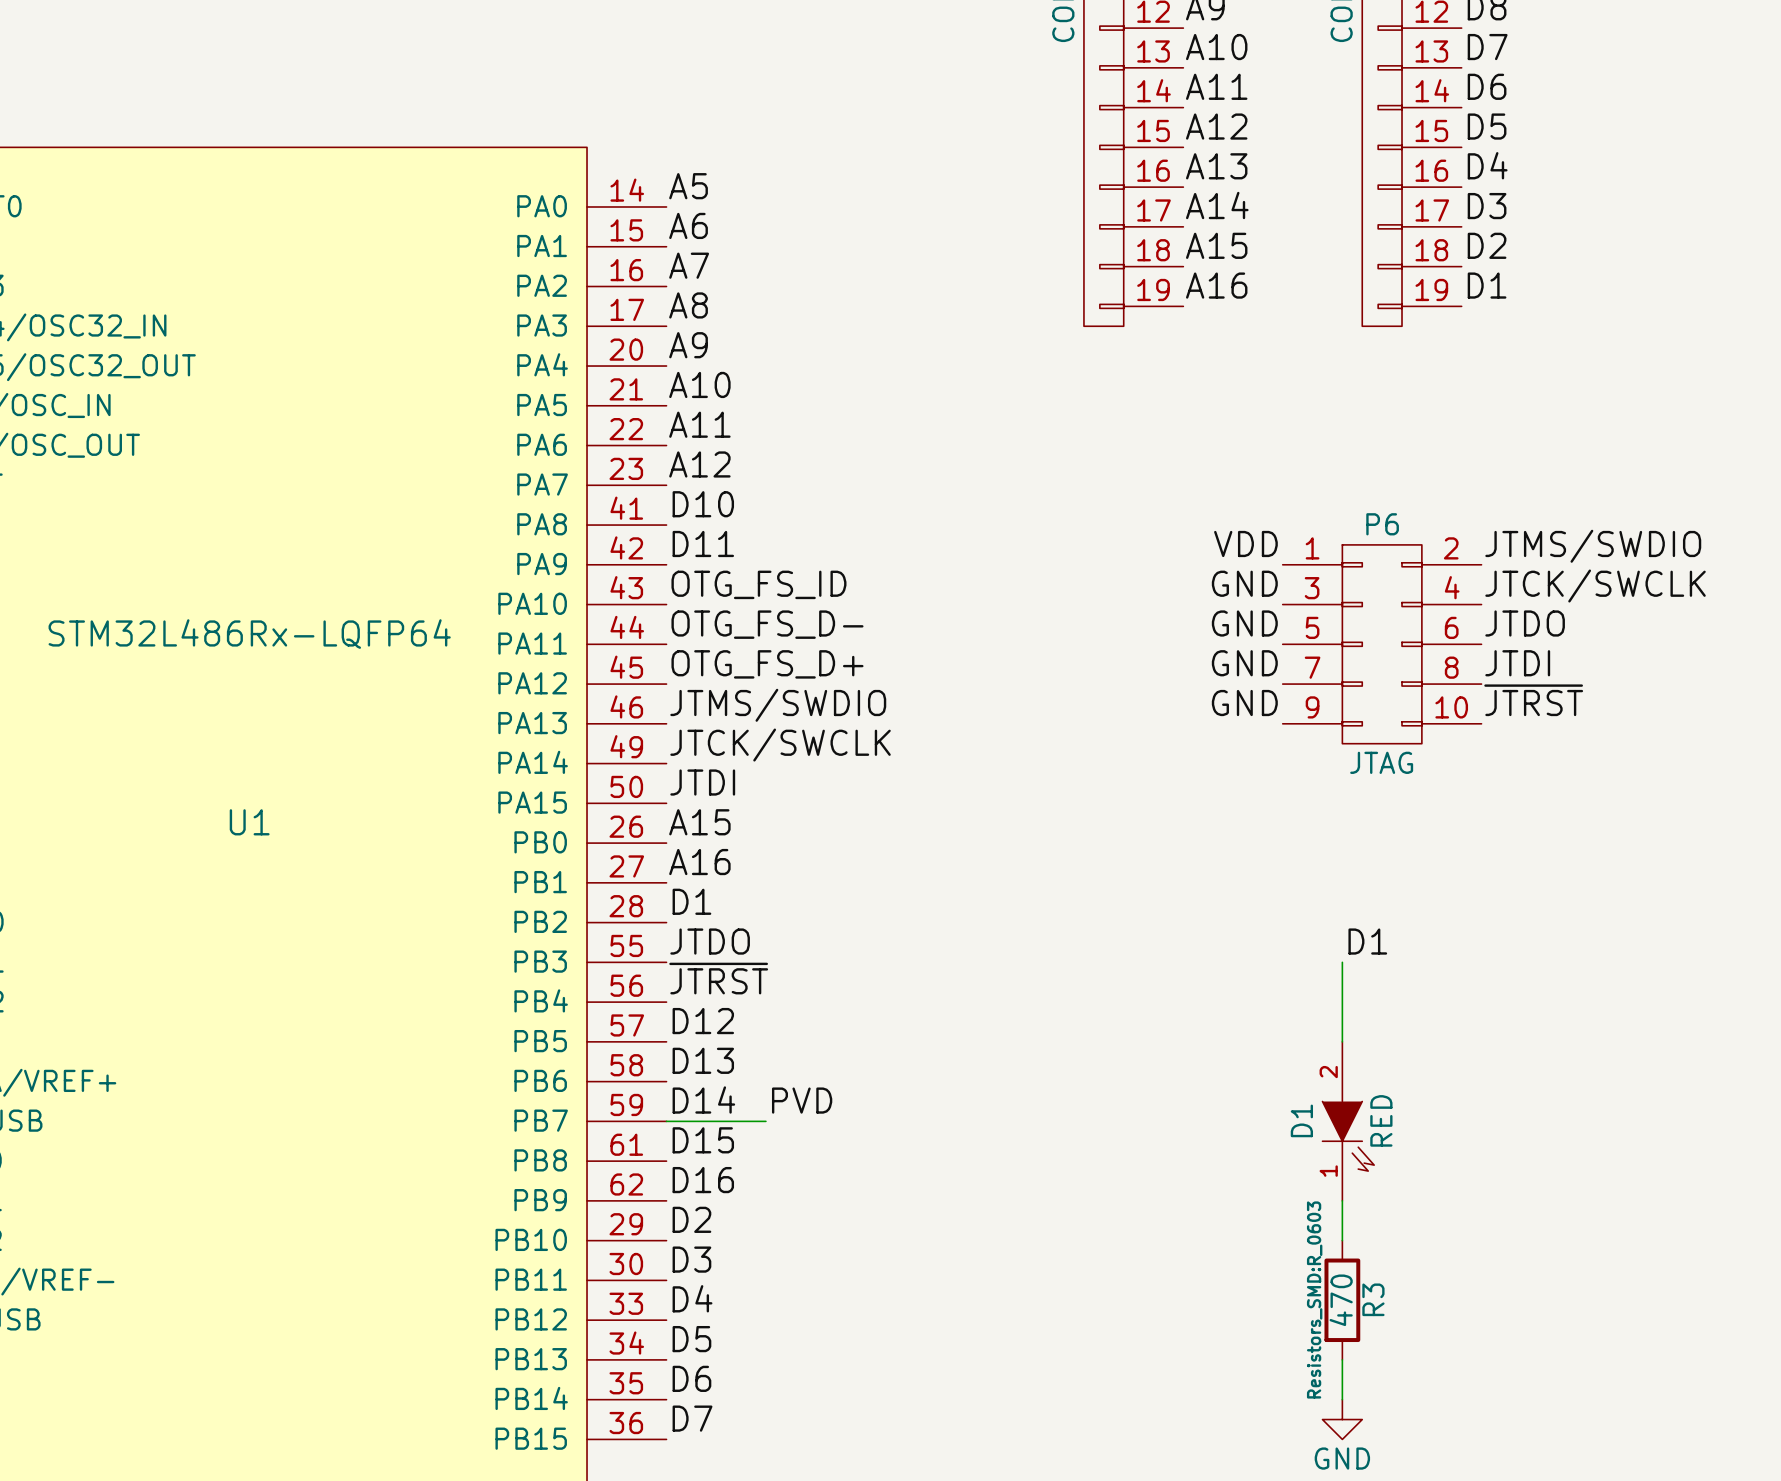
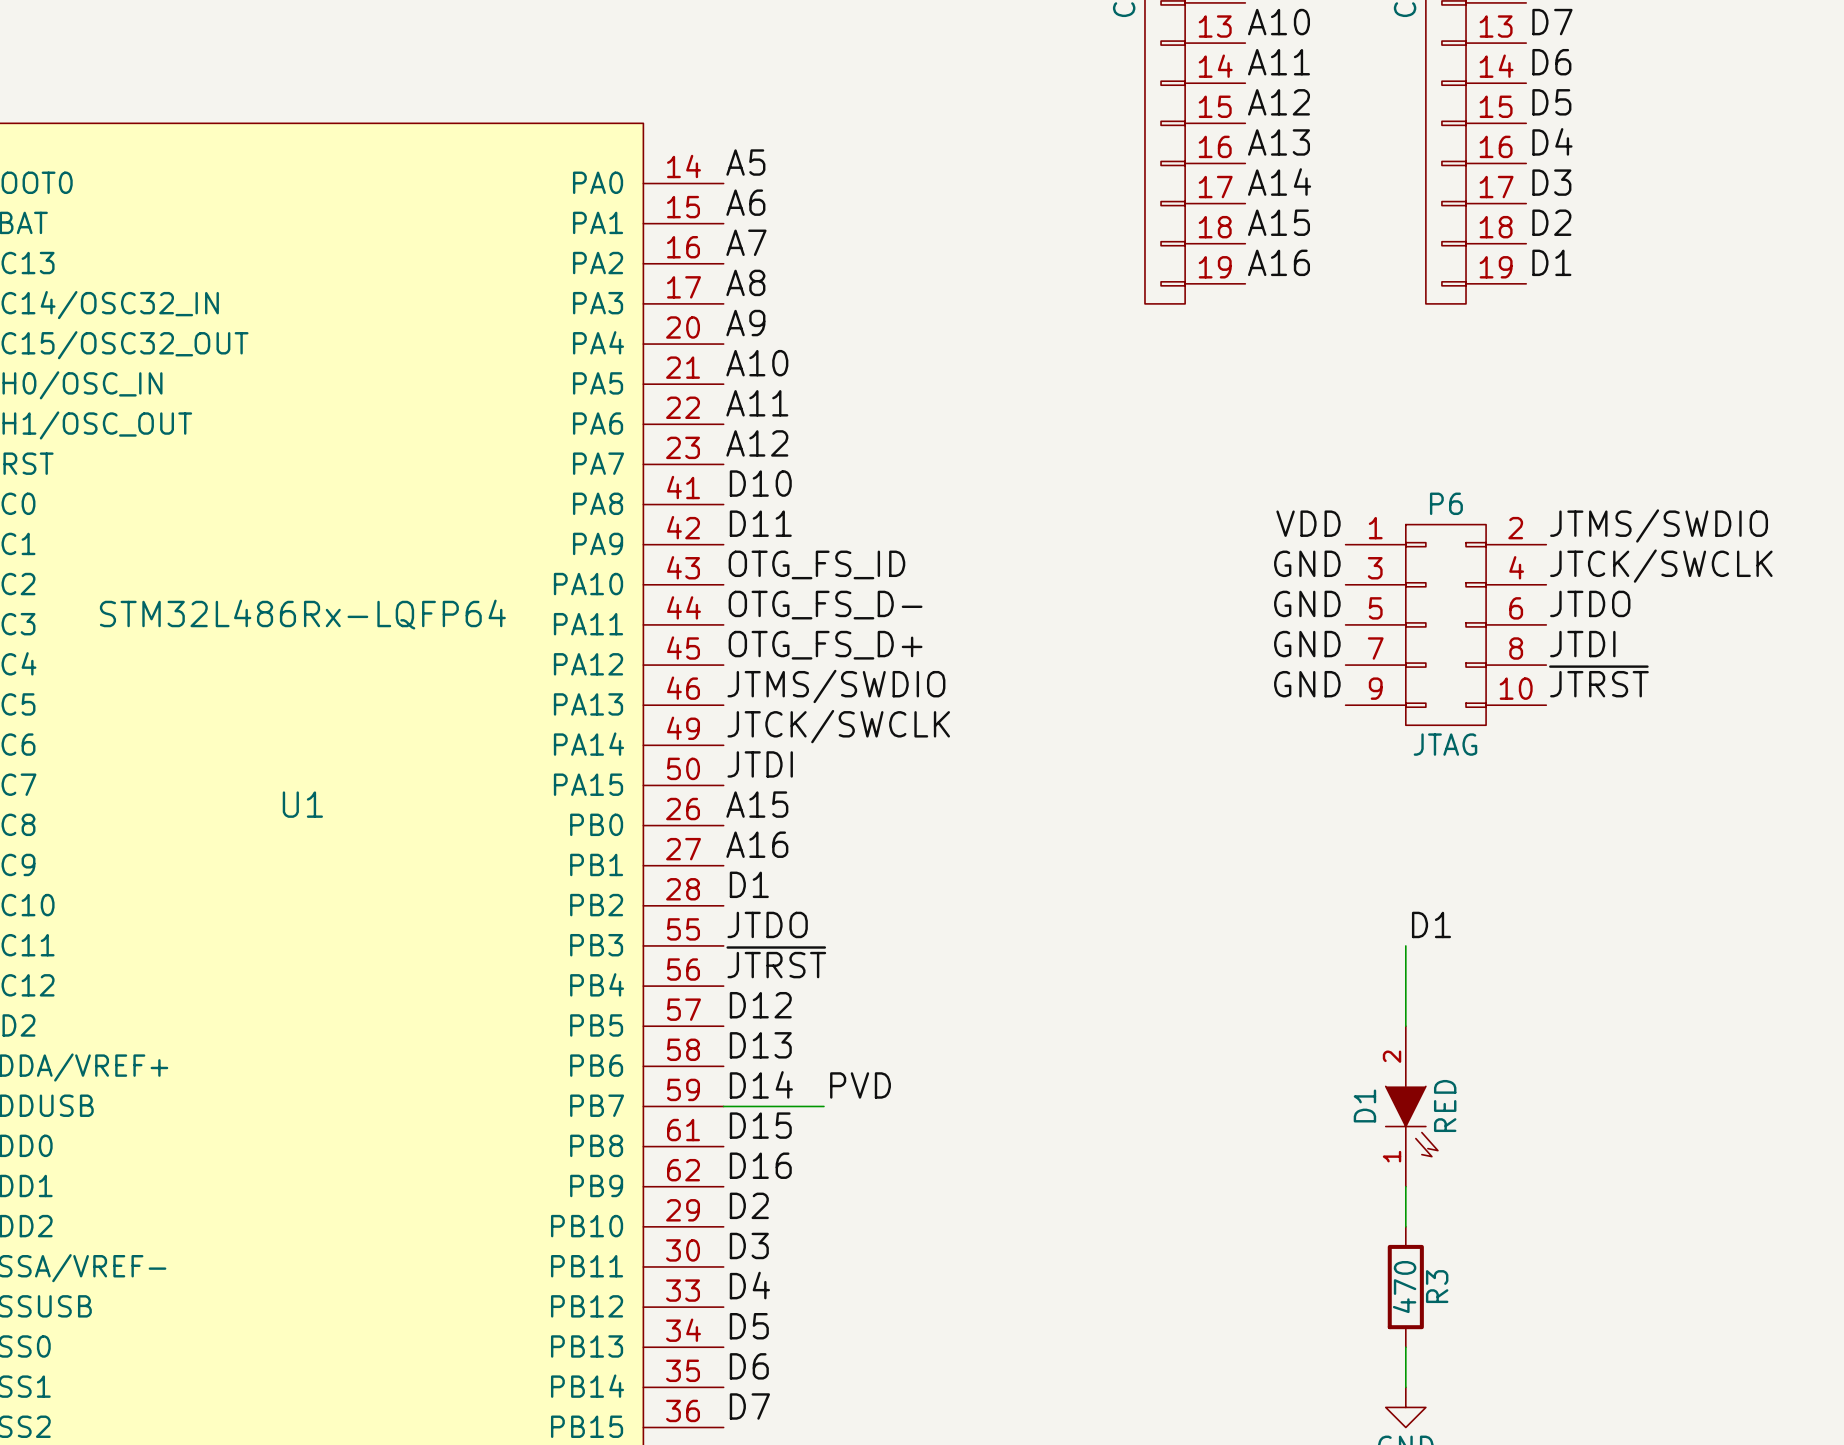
R3 text: Resistors_SMD:R_0603 (1314, 1299) -> none

